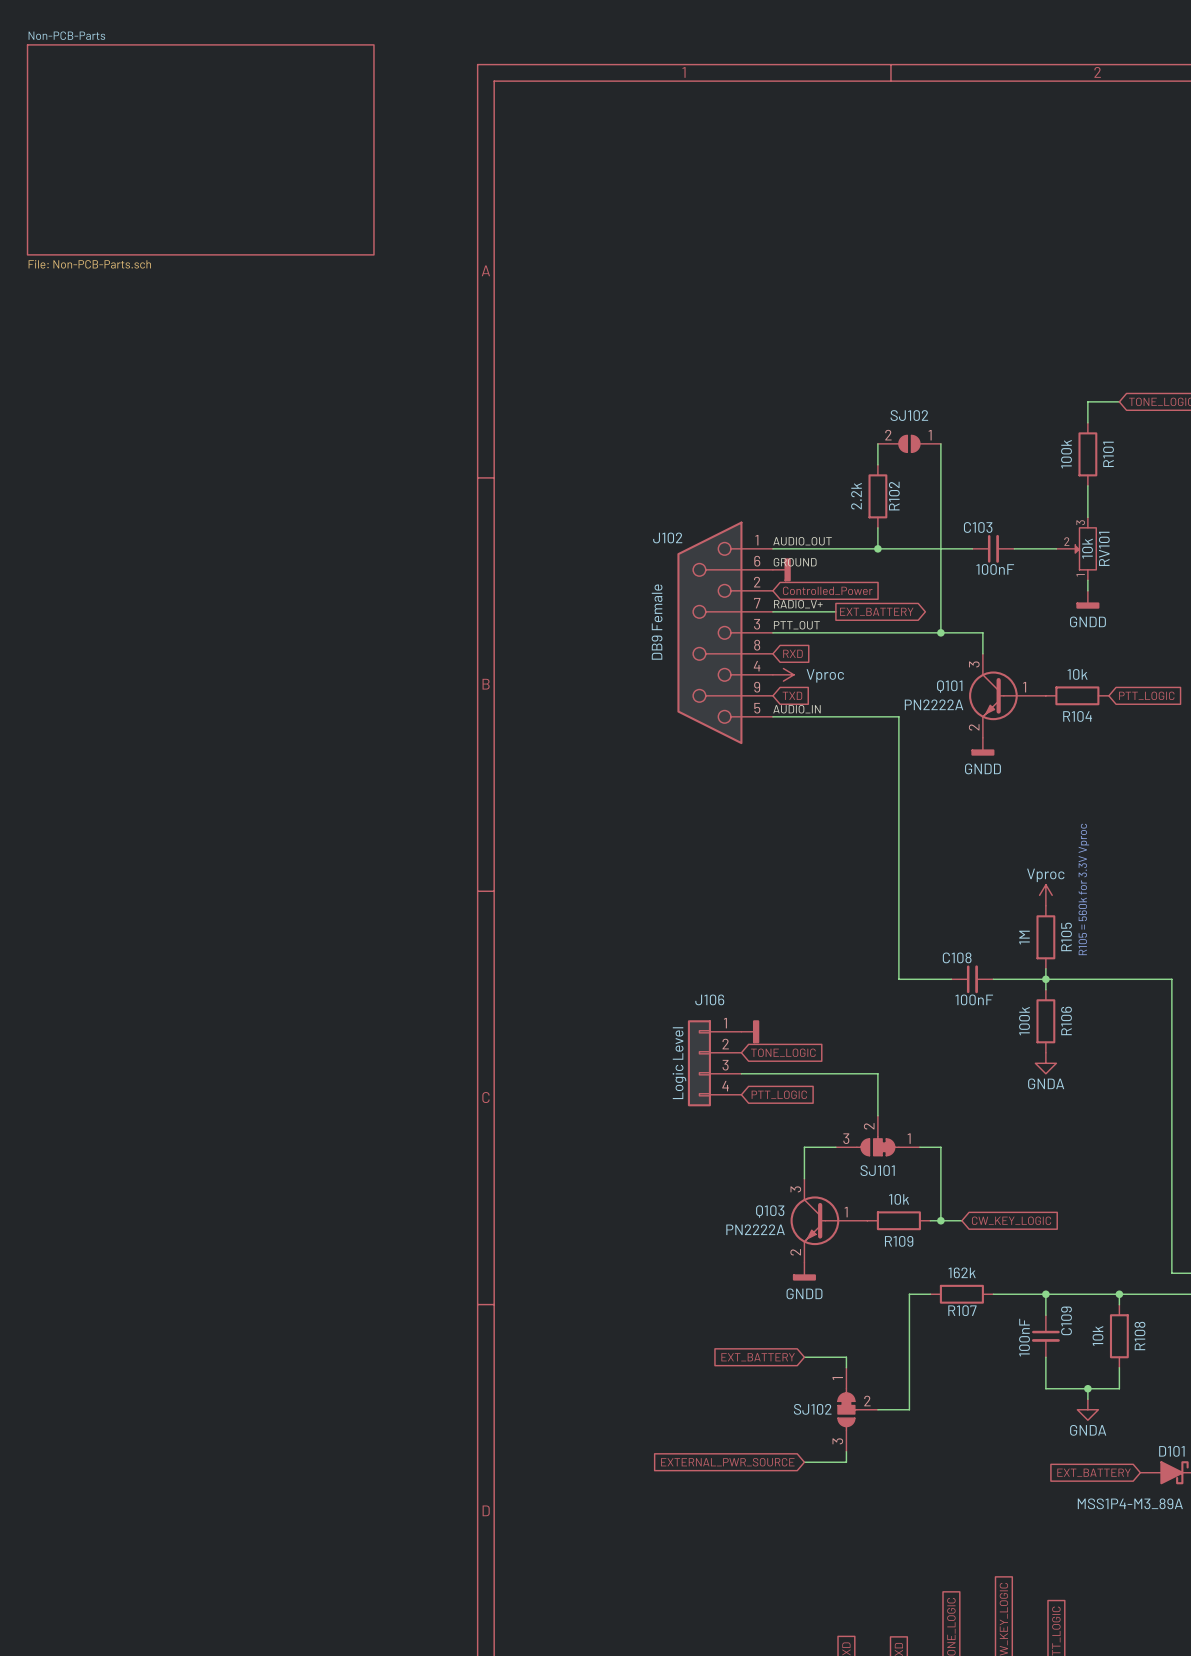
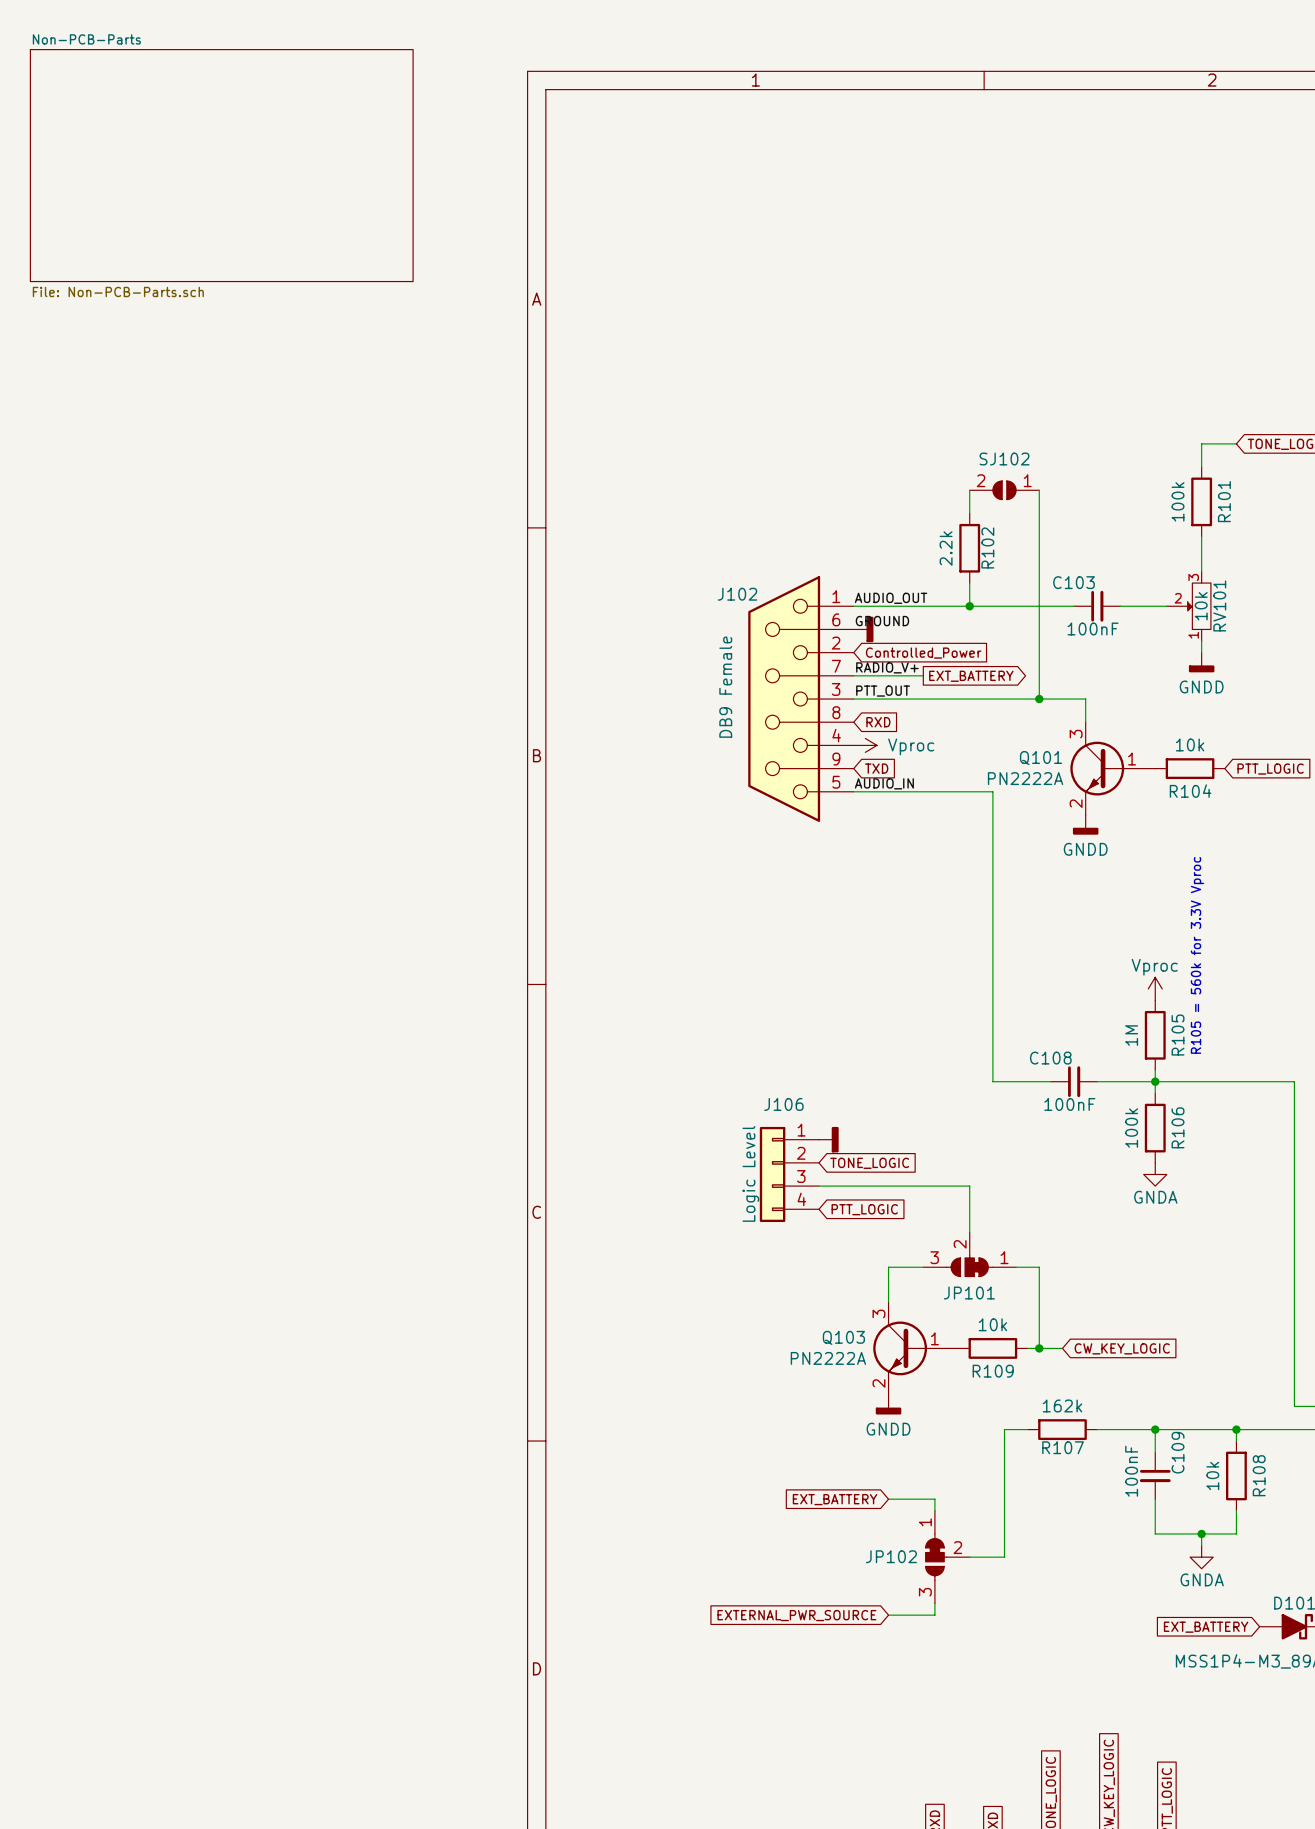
SJ101 name: SJ101 (877, 1170) -> JP101 (969, 1293)
SJ102 name: SJ102 (812, 1409) -> JP102 (891, 1556)

